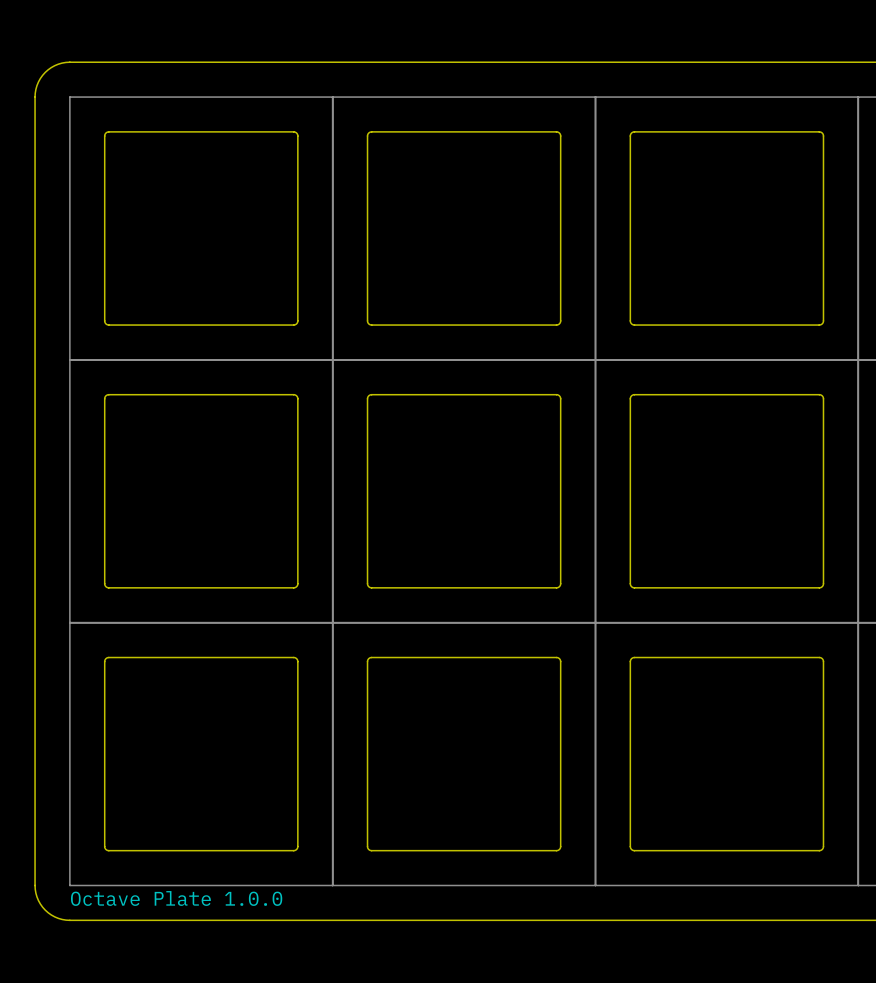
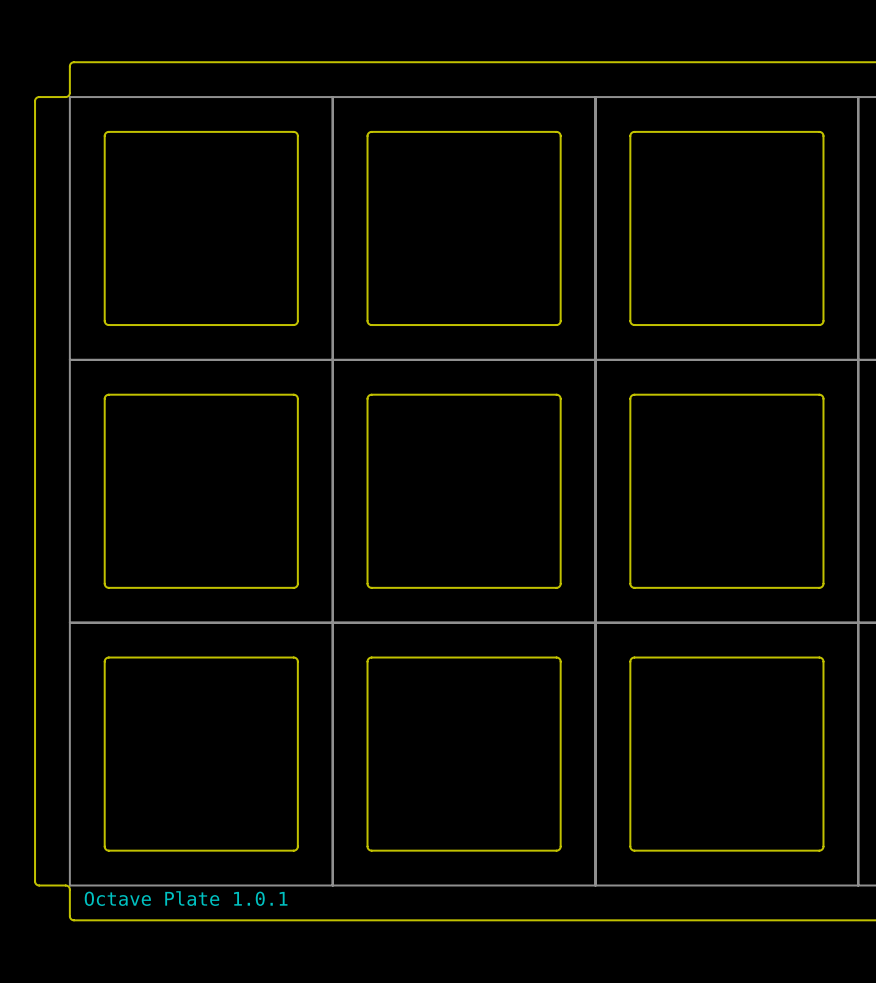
board edge: (74, 62) (58, 64) (45, 72) (36, 85) (35, 101) -> (74, 62) (69, 65) (68, 95) (38, 97) (35, 101)
board edge: (35, 881) (36, 897) (45, 910) (58, 918) (74, 920) -> (35, 881) (38, 885) (68, 886) (69, 916) (74, 920)
text: Octave Plate 1.0.0 (176, 898) -> Octave Plate 1.0.1 (186, 898)

